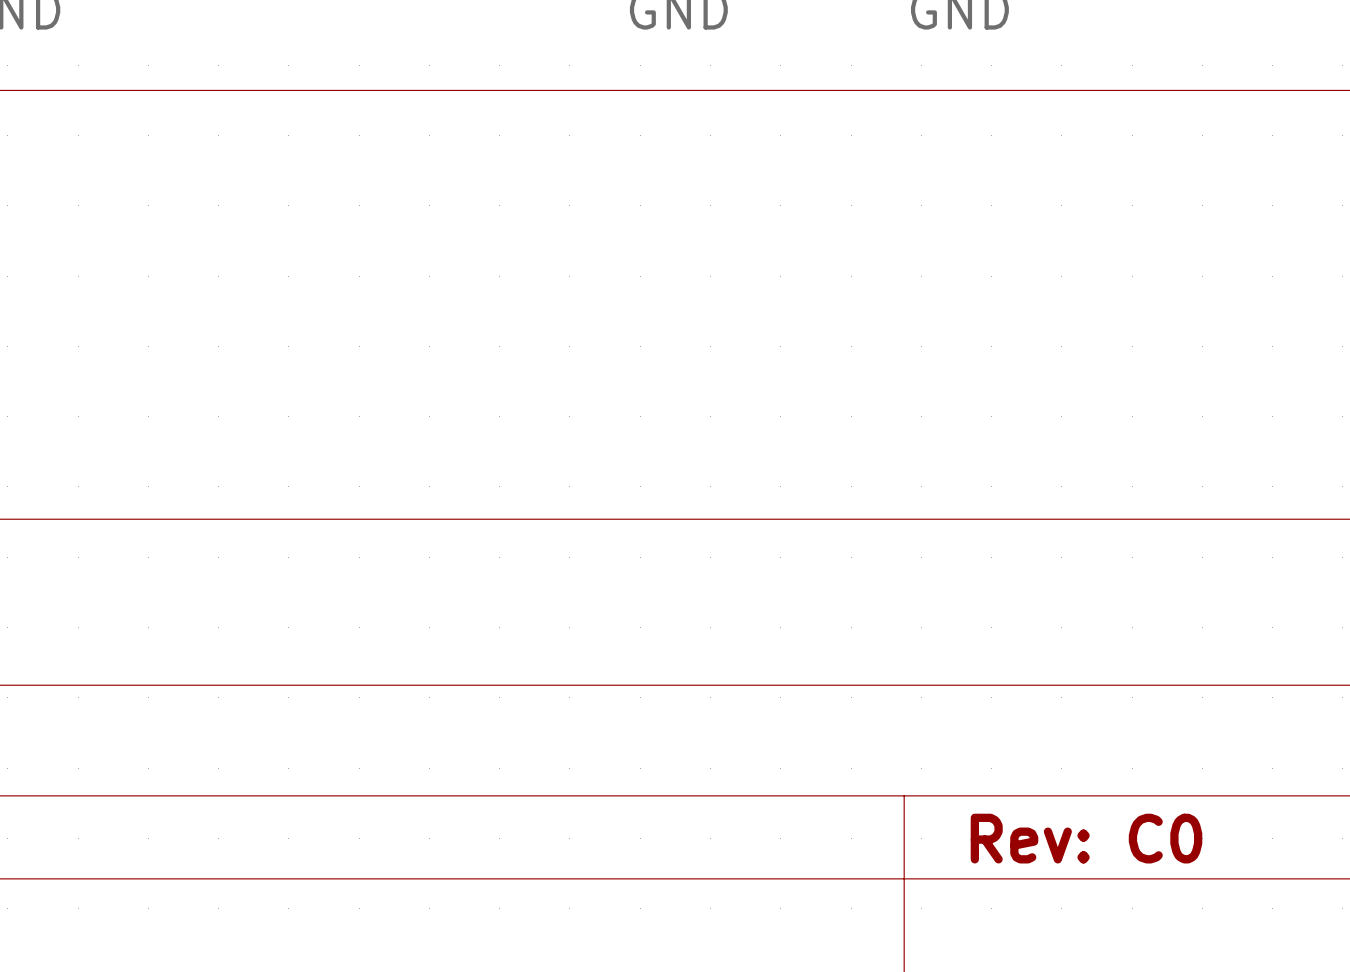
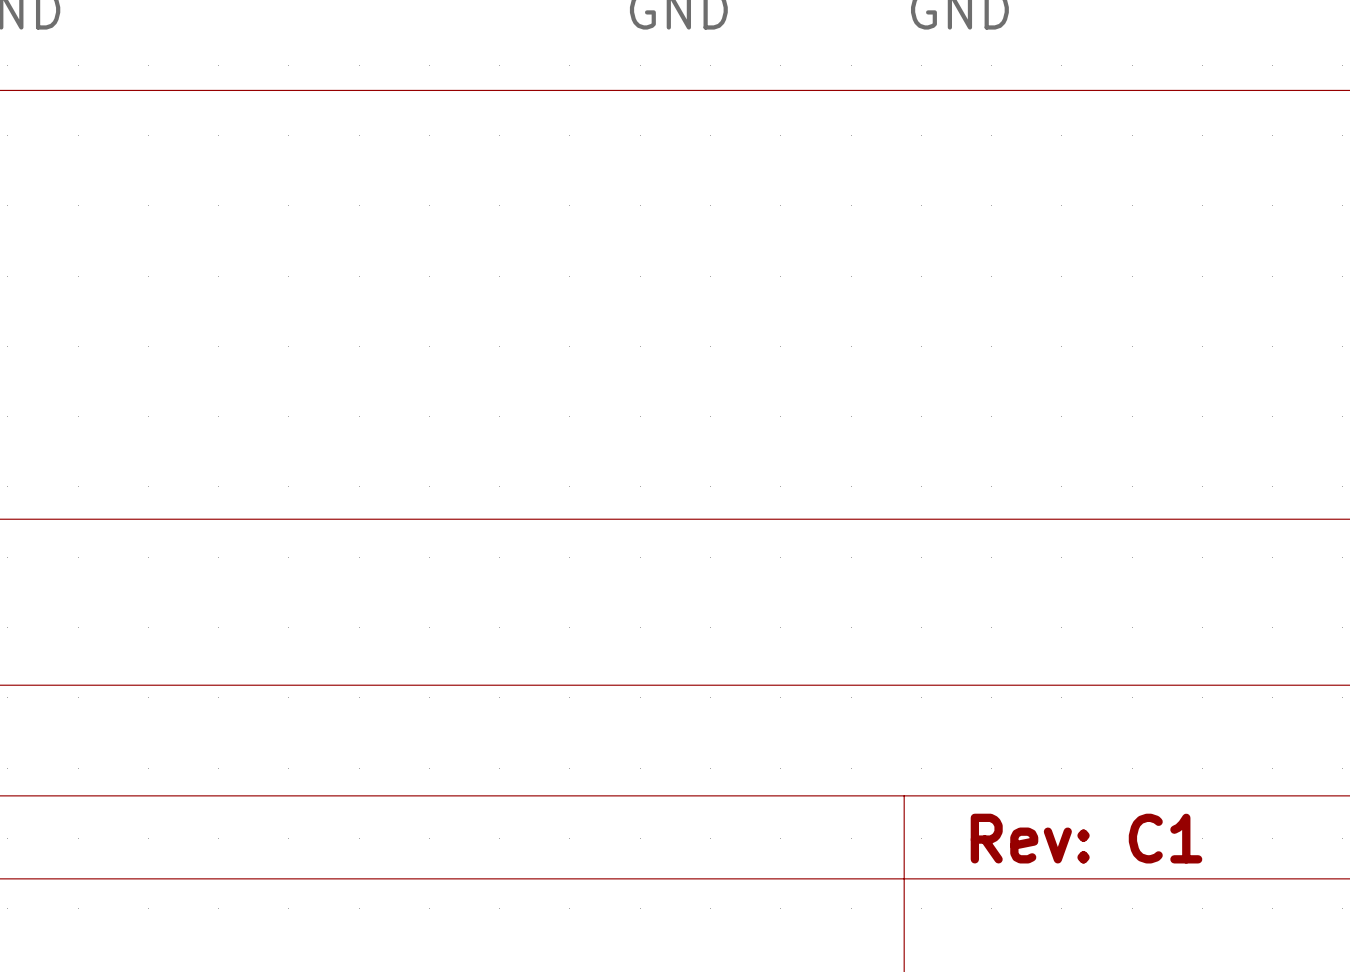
title block: Rev: C0 (1086, 838) -> Rev: C1 (1086, 838)

